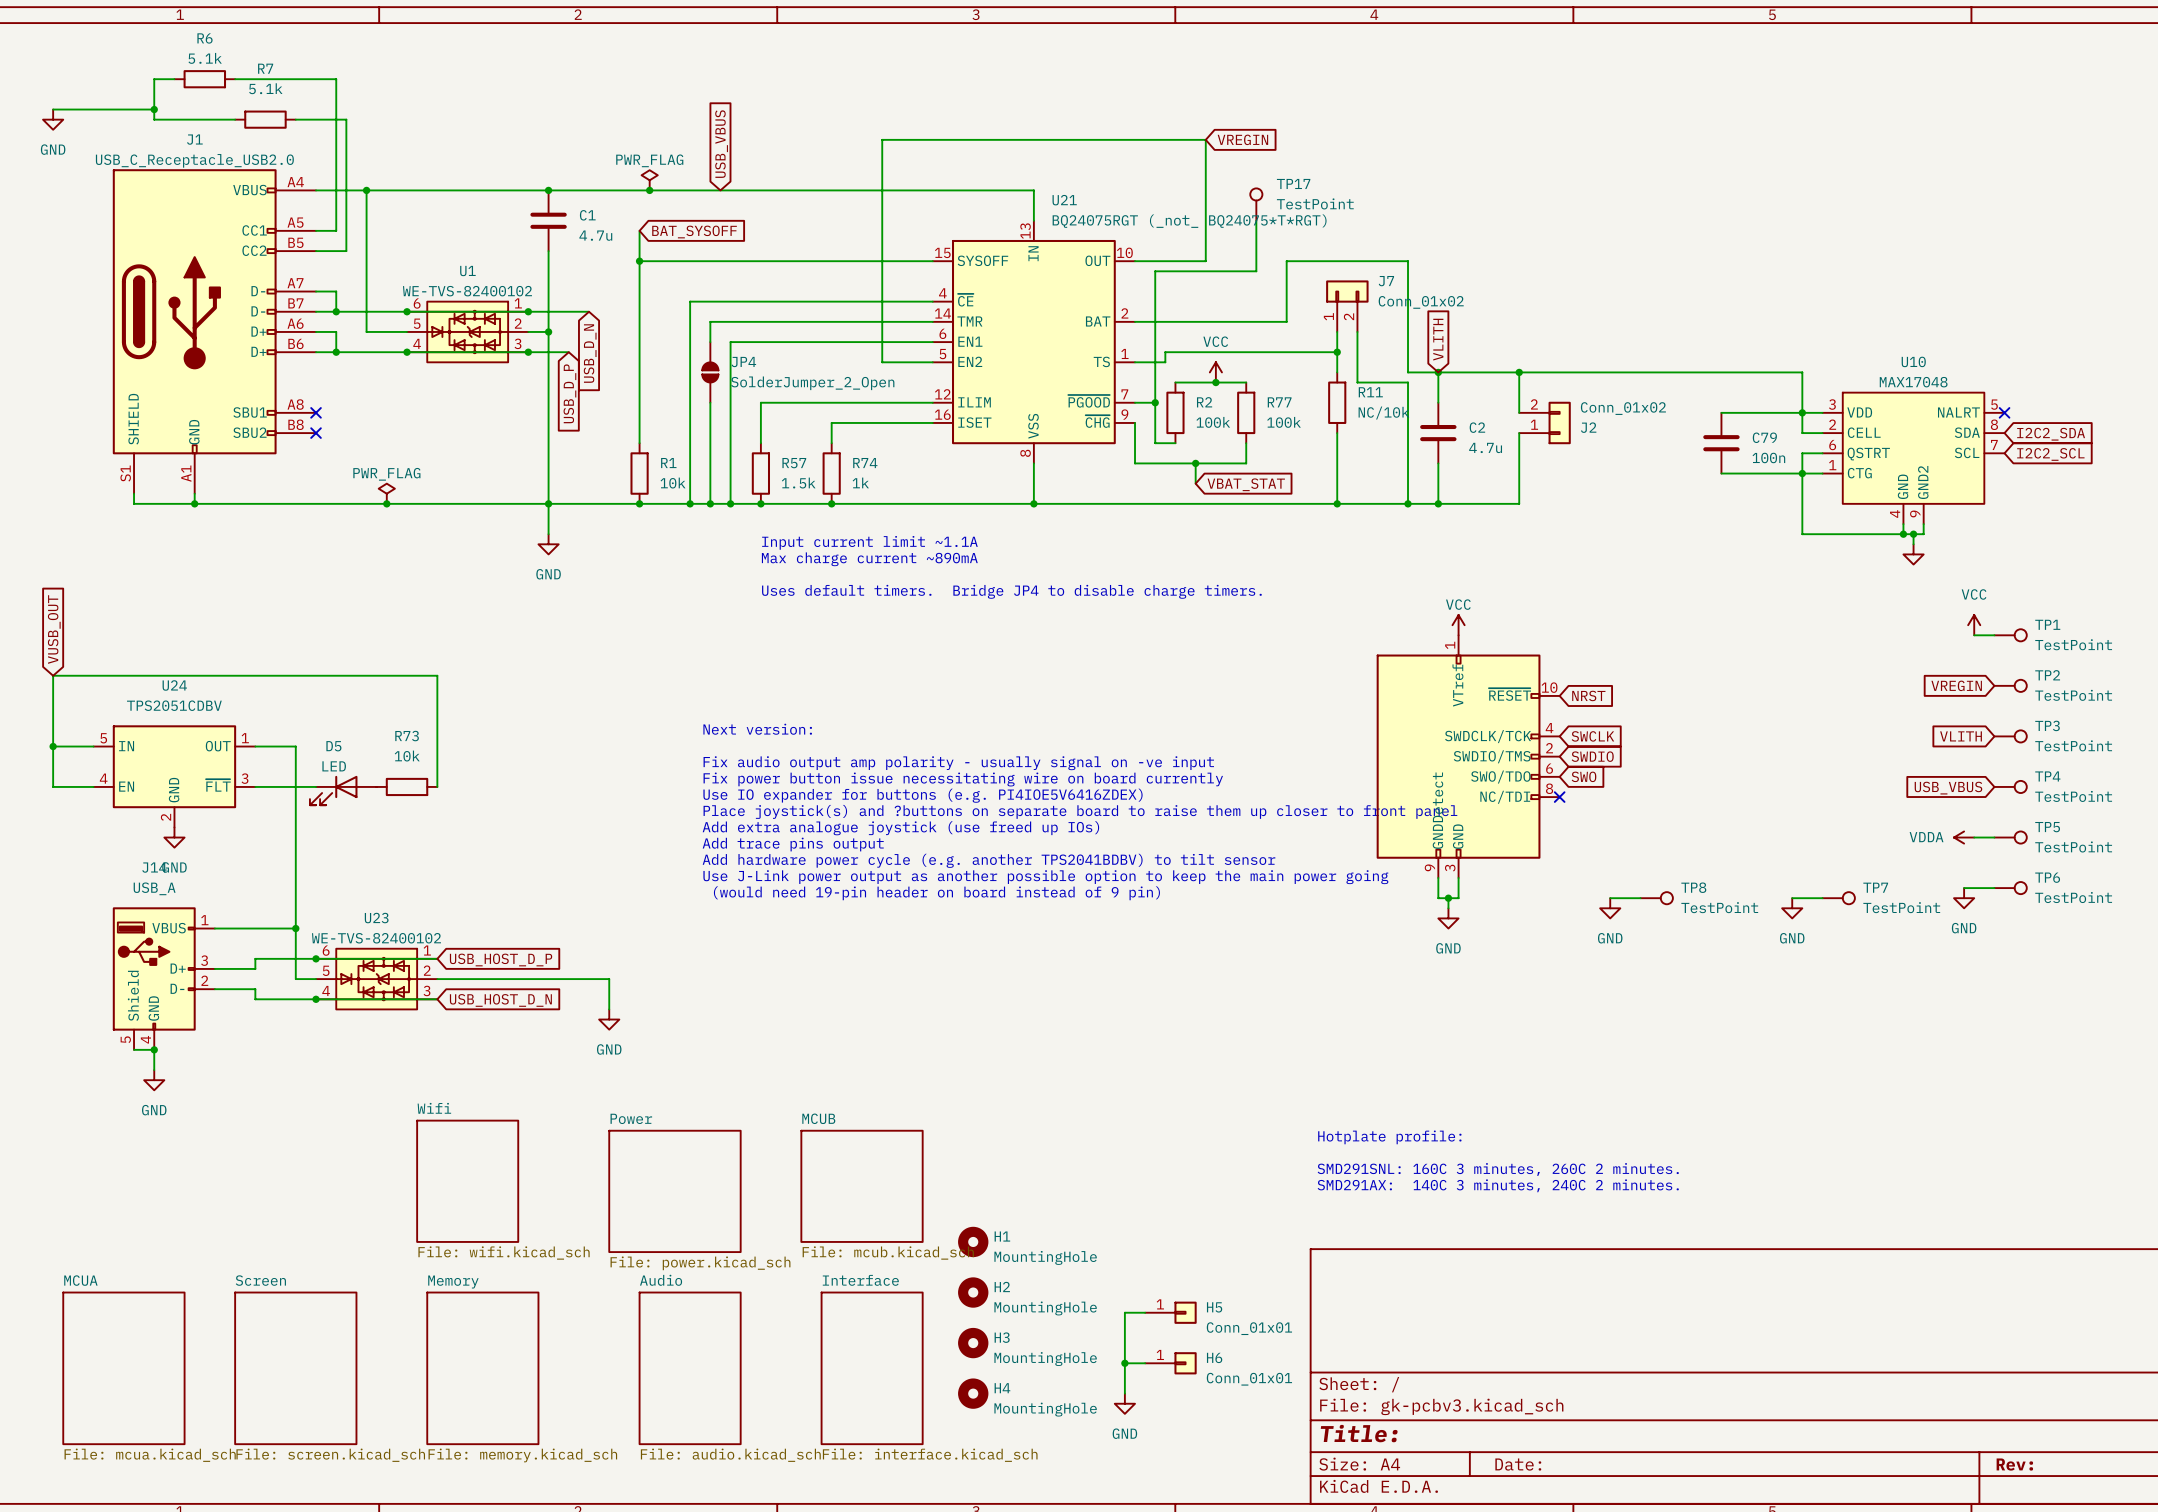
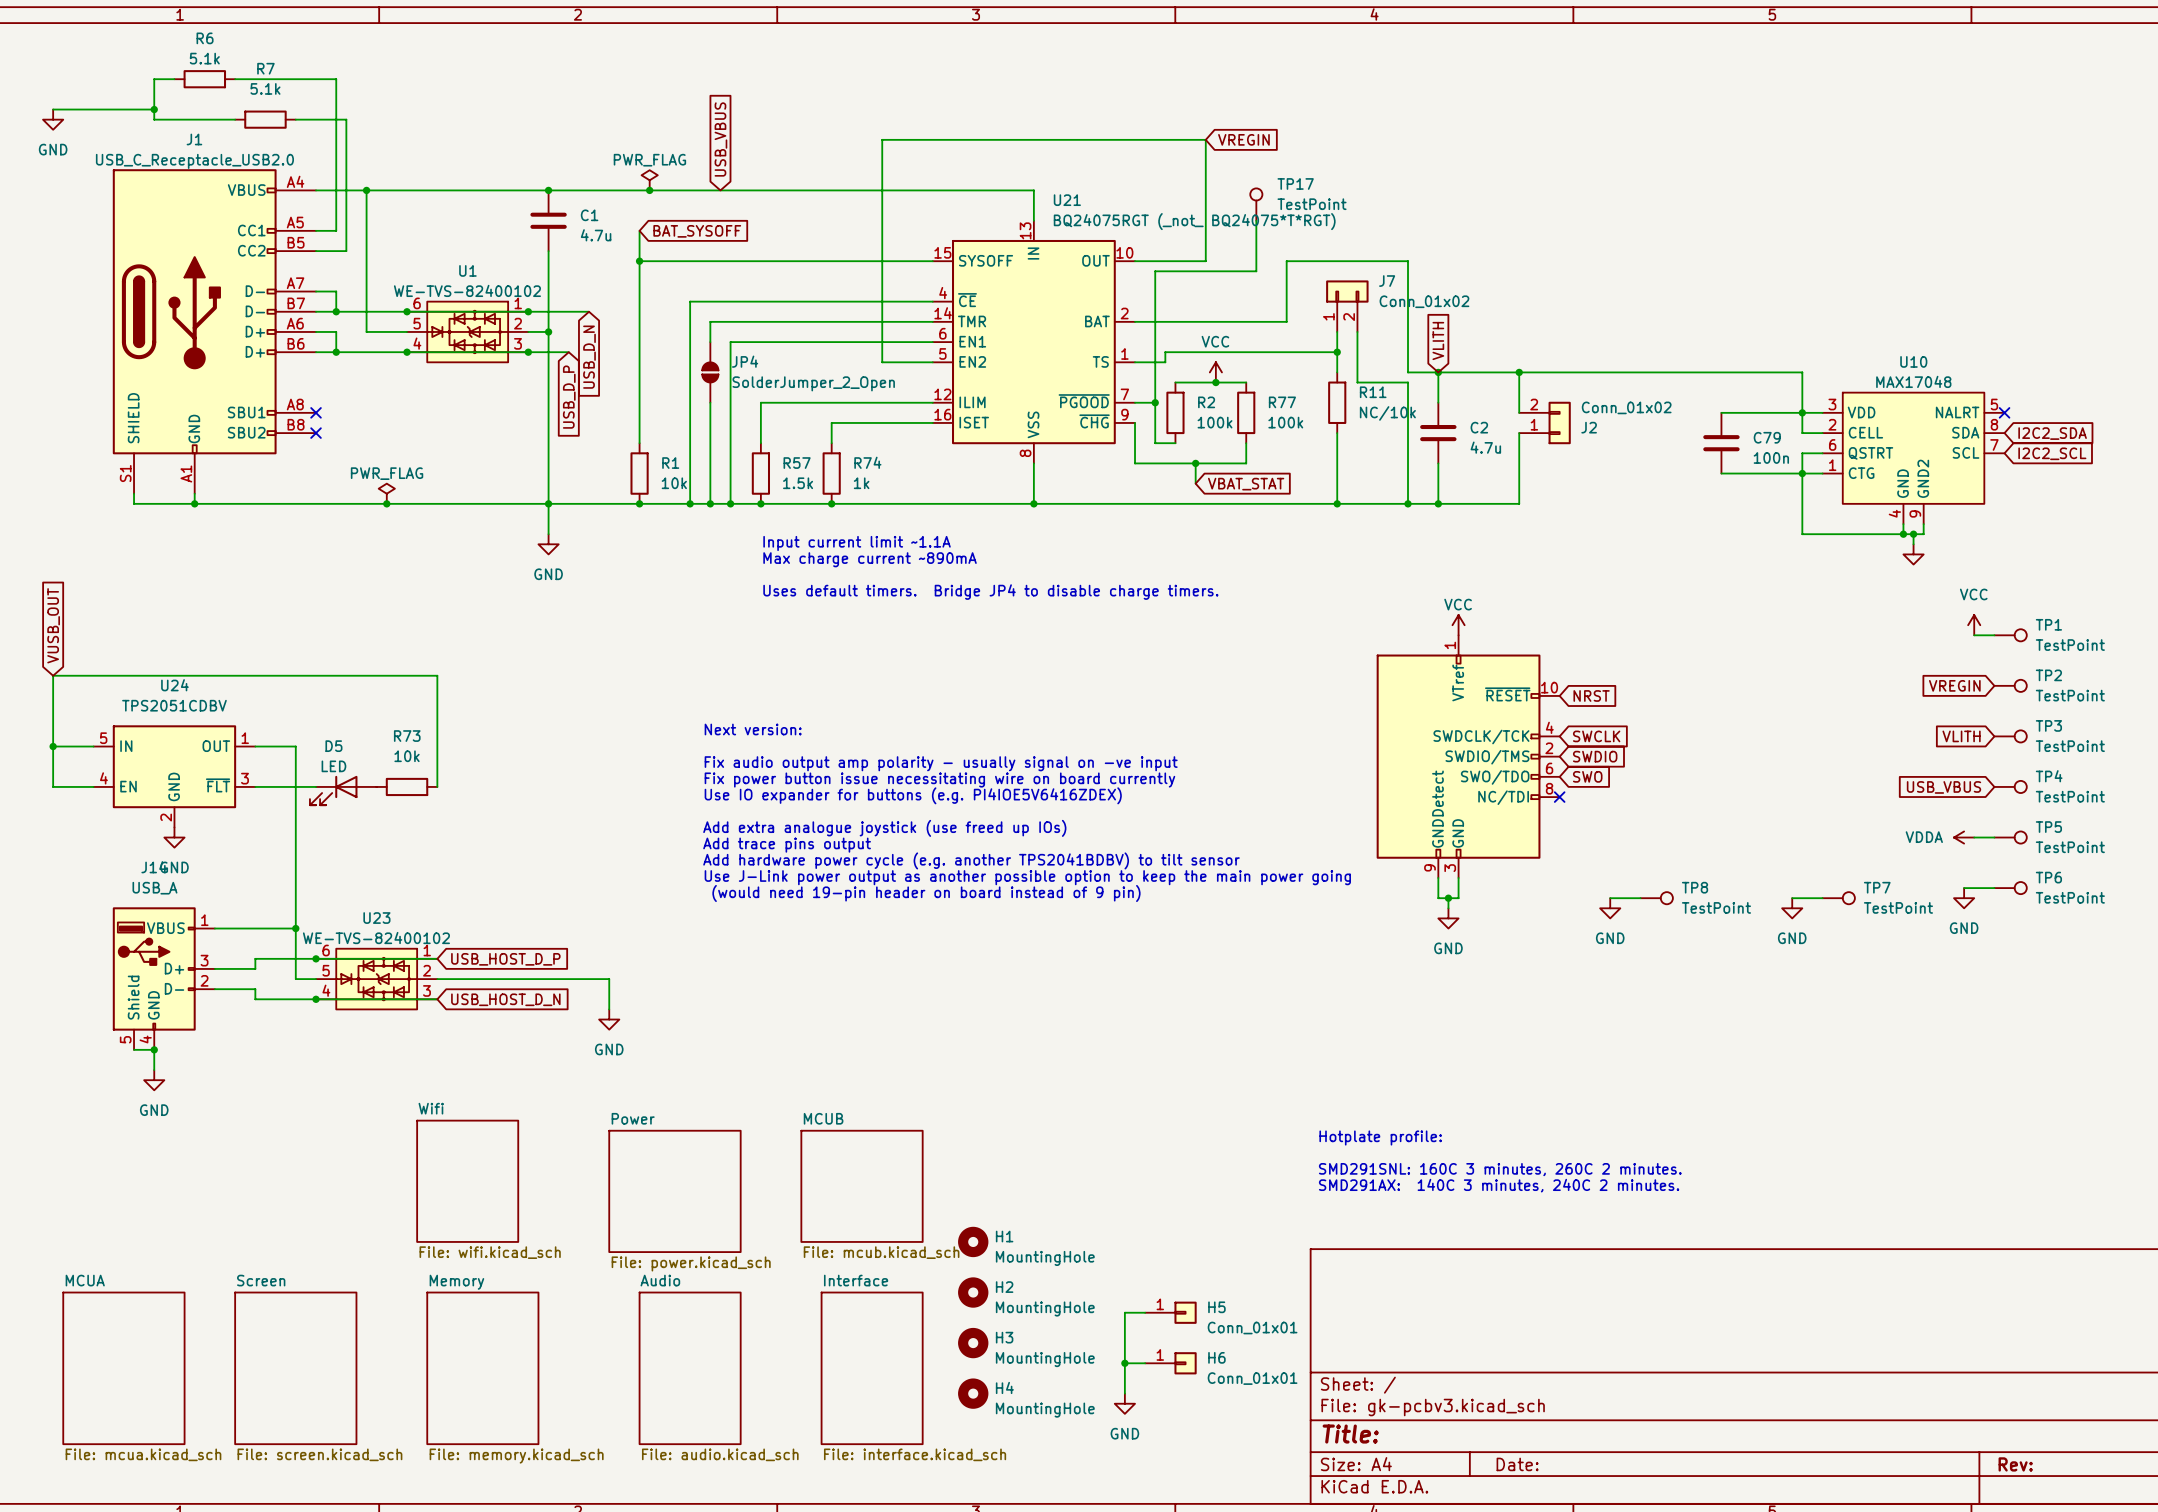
text: Place joystick(s) and ?buttons on separate board to raise them up closer to front panel (1080, 811) -> none

